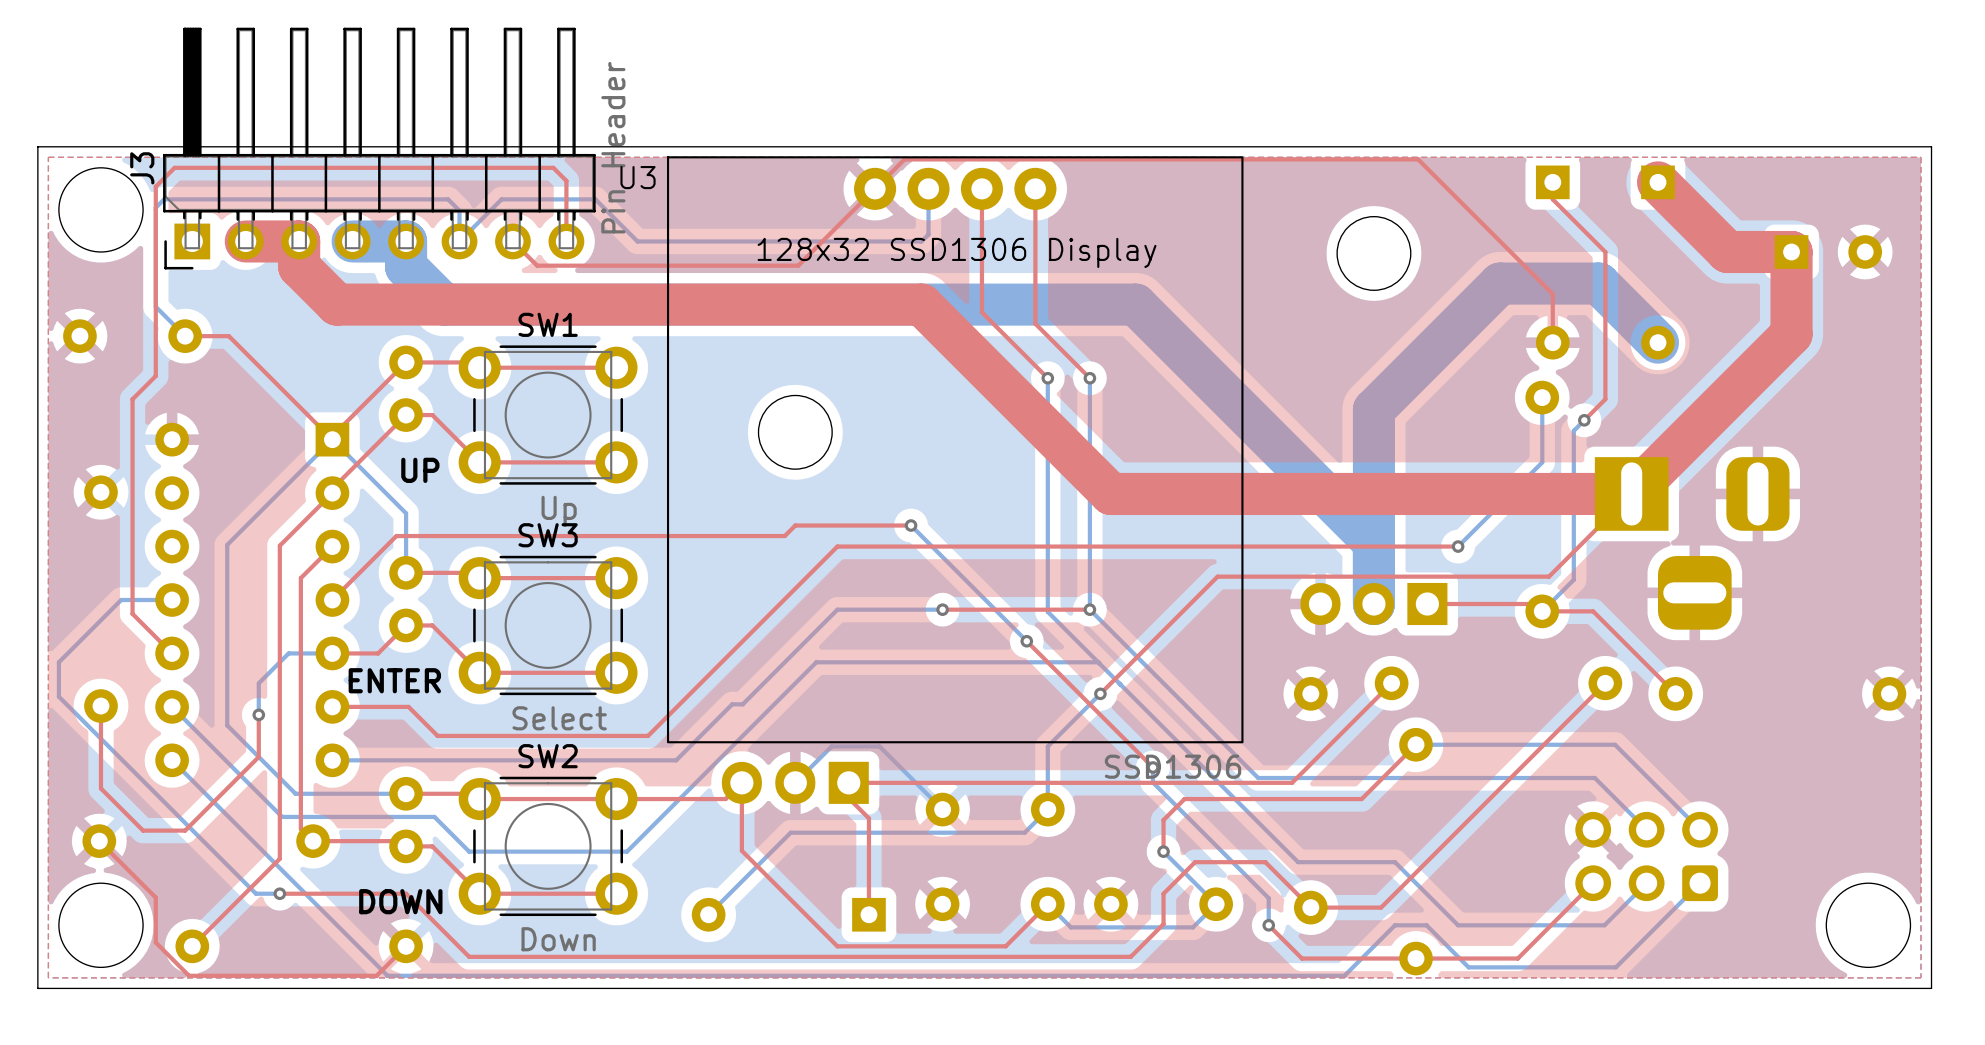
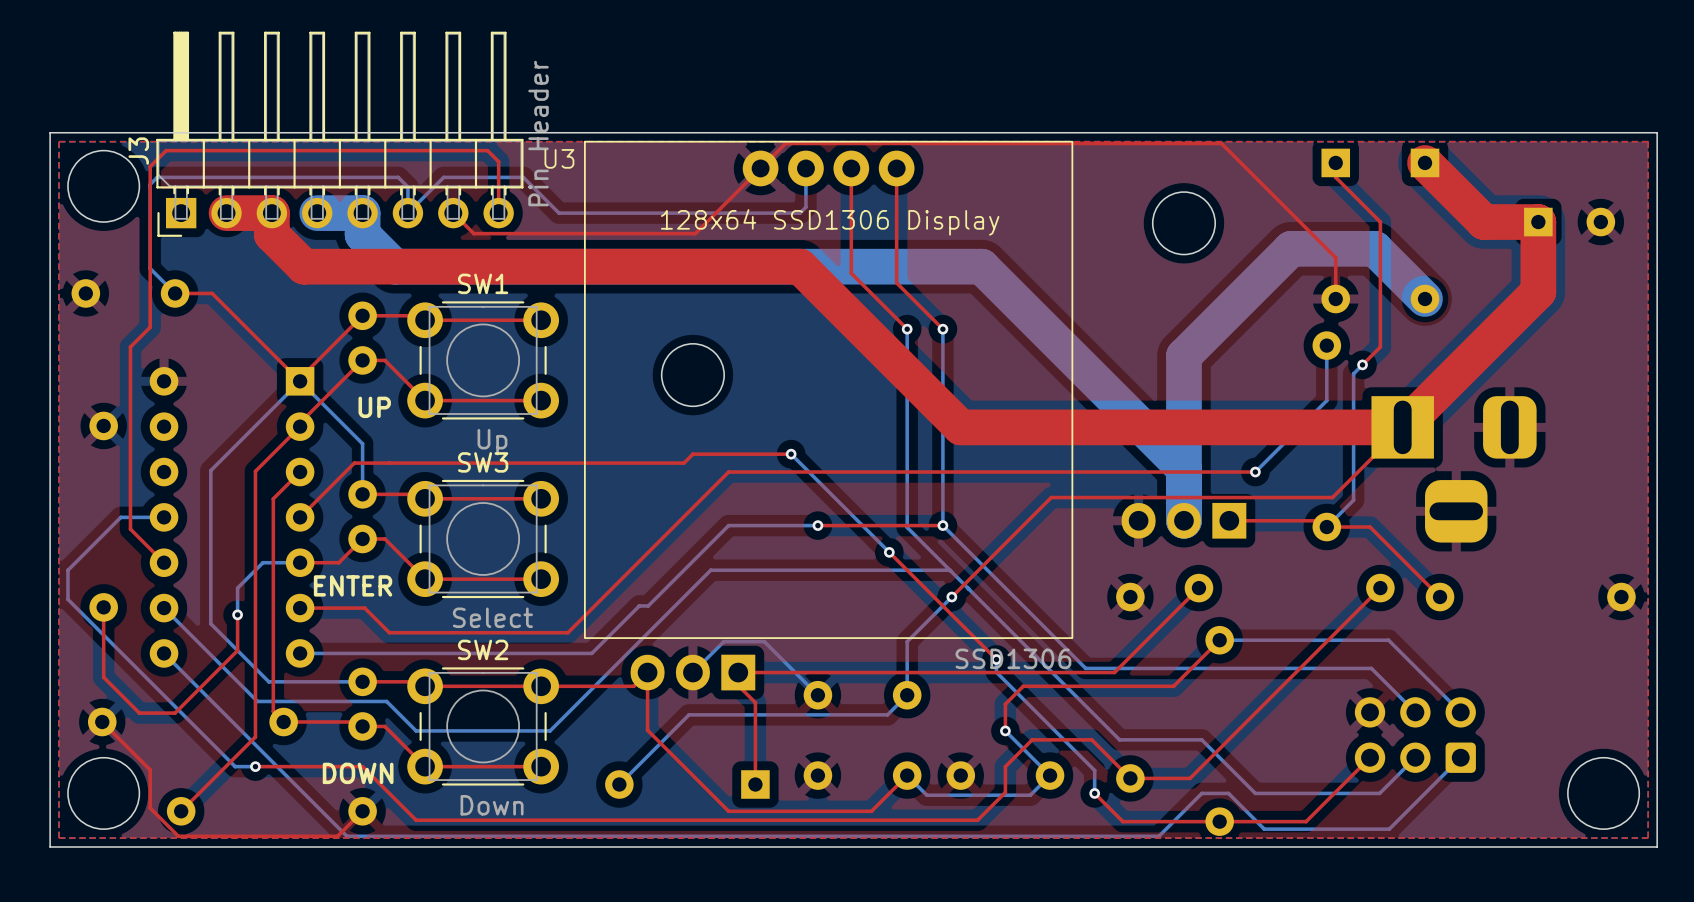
text: 128x32 SSD1306 Display (957, 252) -> 128x64 SSD1306 Display (830, 222)

